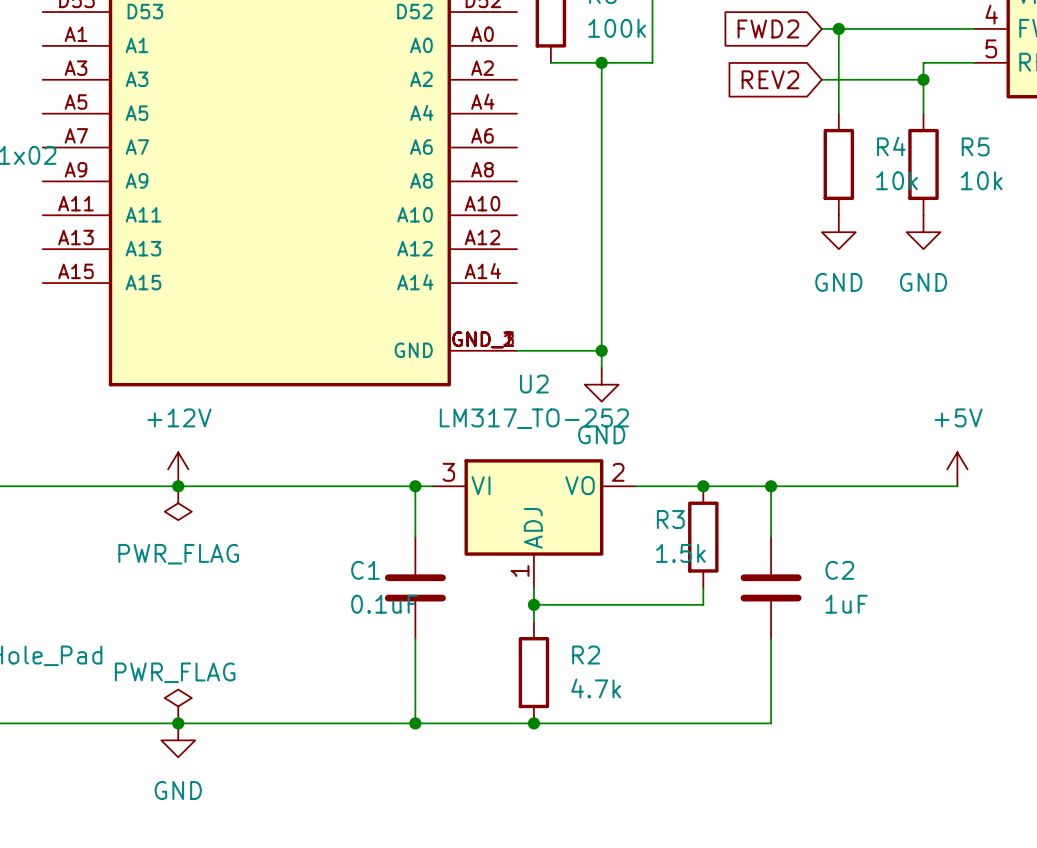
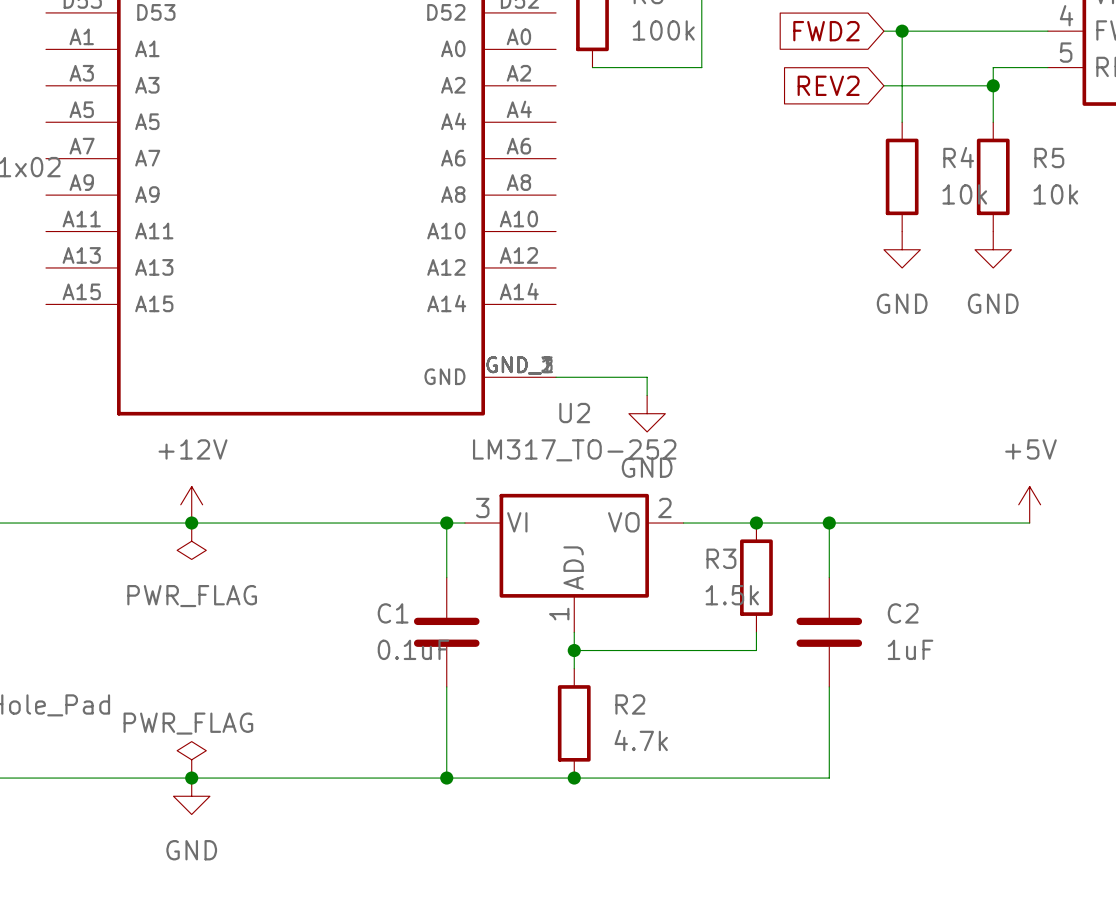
wire: (601, 62) (601, 350) -> none
junction: (601, 62) -> none
junction: (601, 350) -> none

